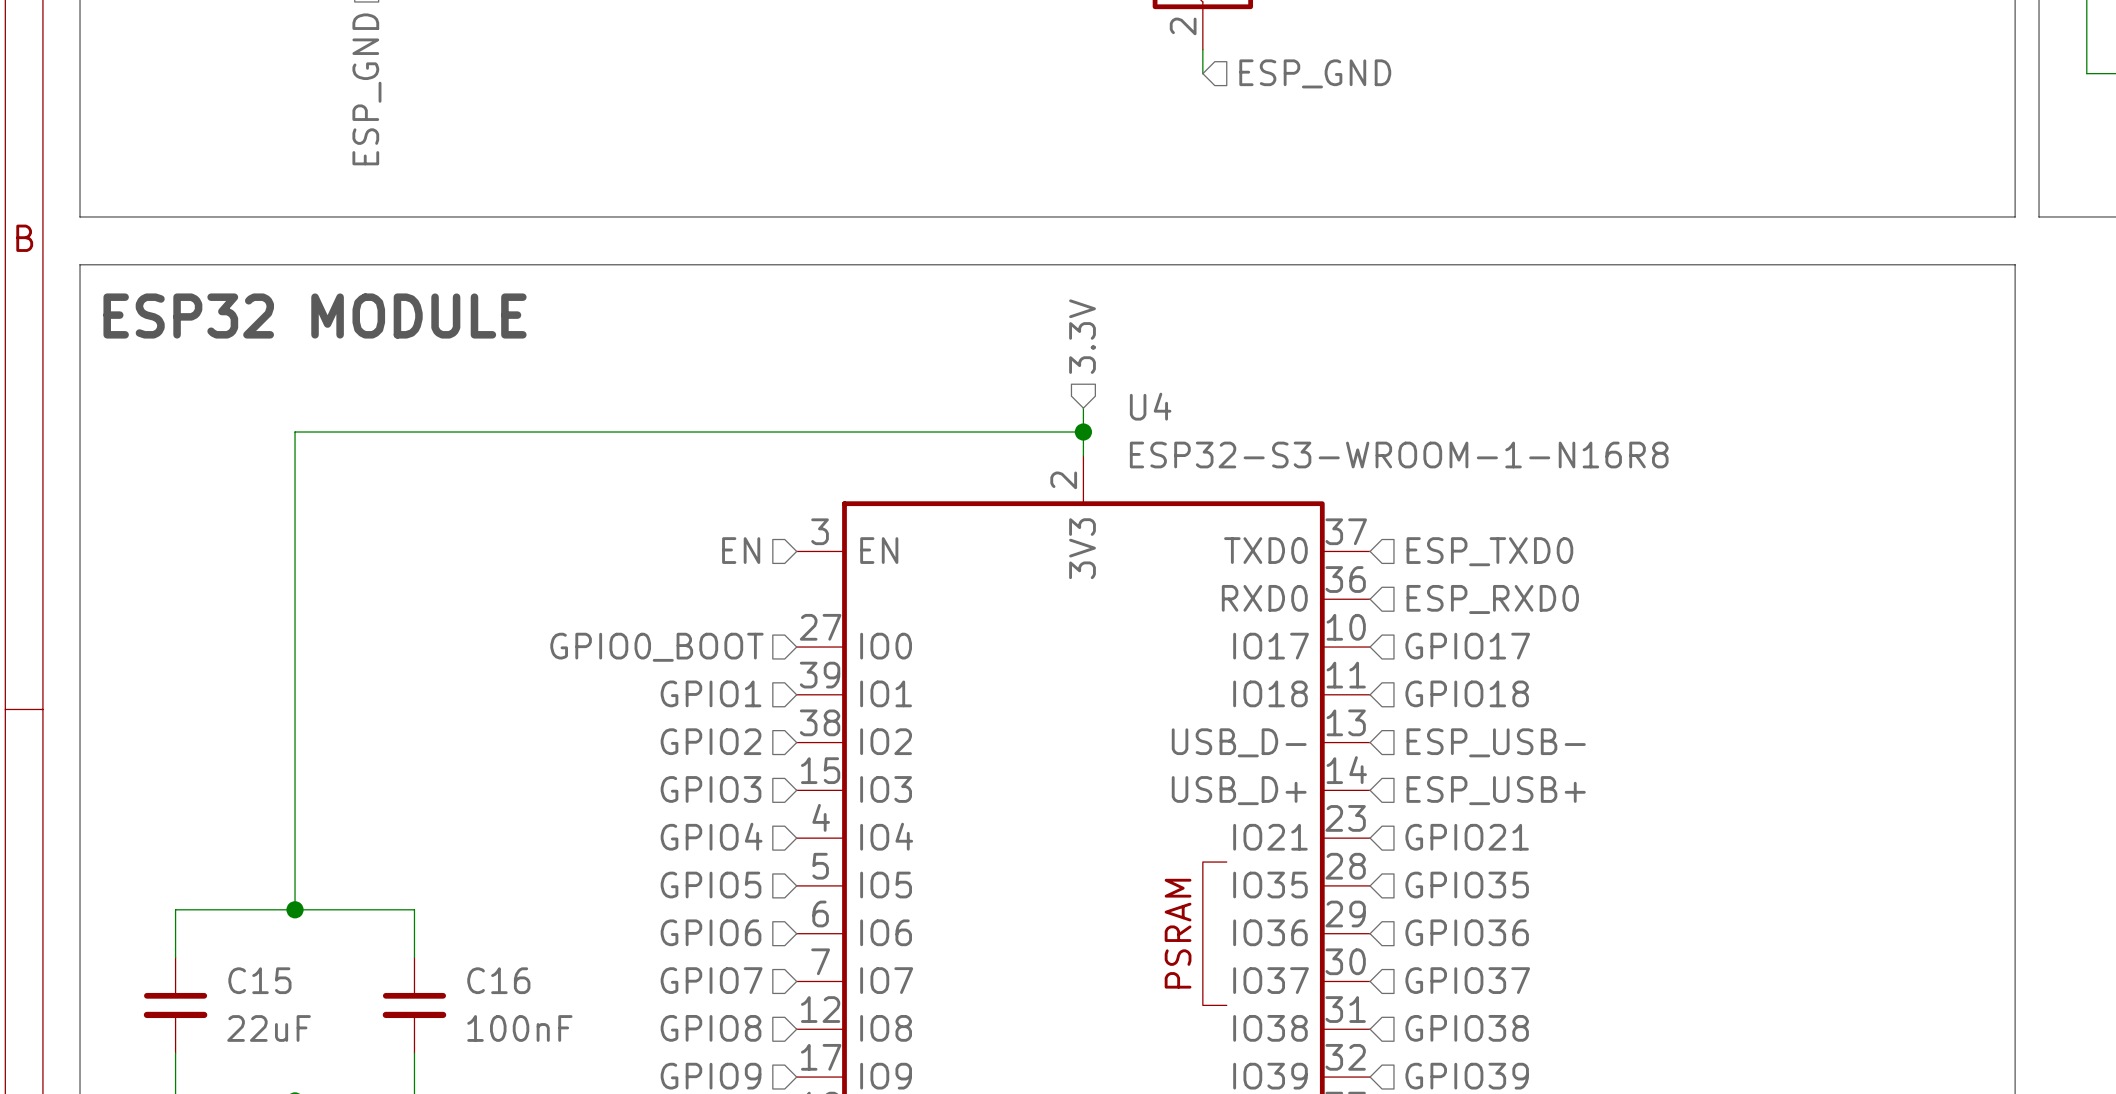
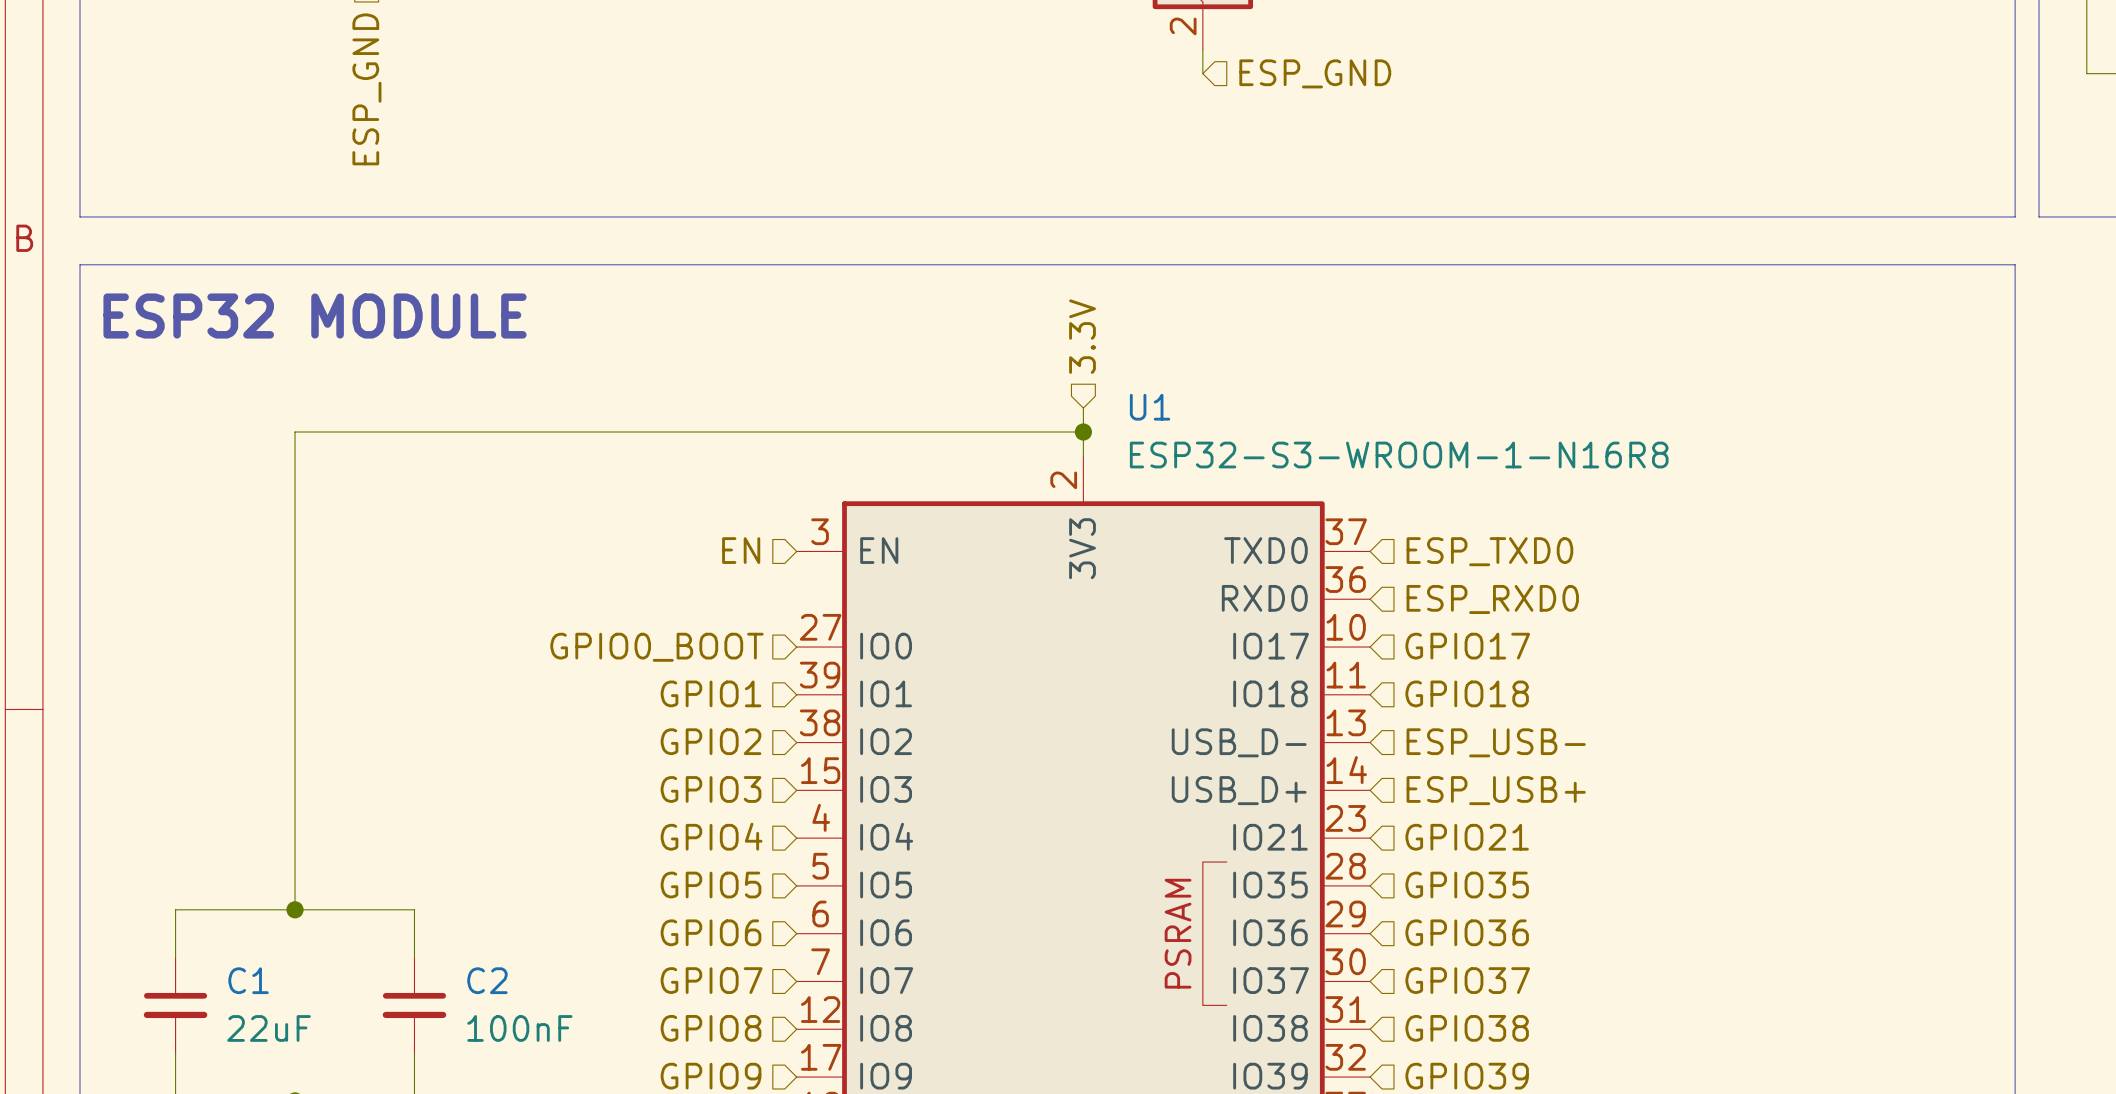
U4 name: U4 (1150, 406) -> U1 (1150, 407)
C15 name: C15 (259, 980) -> C1 (248, 980)
C16 name: C16 (498, 980) -> C2 (487, 980)

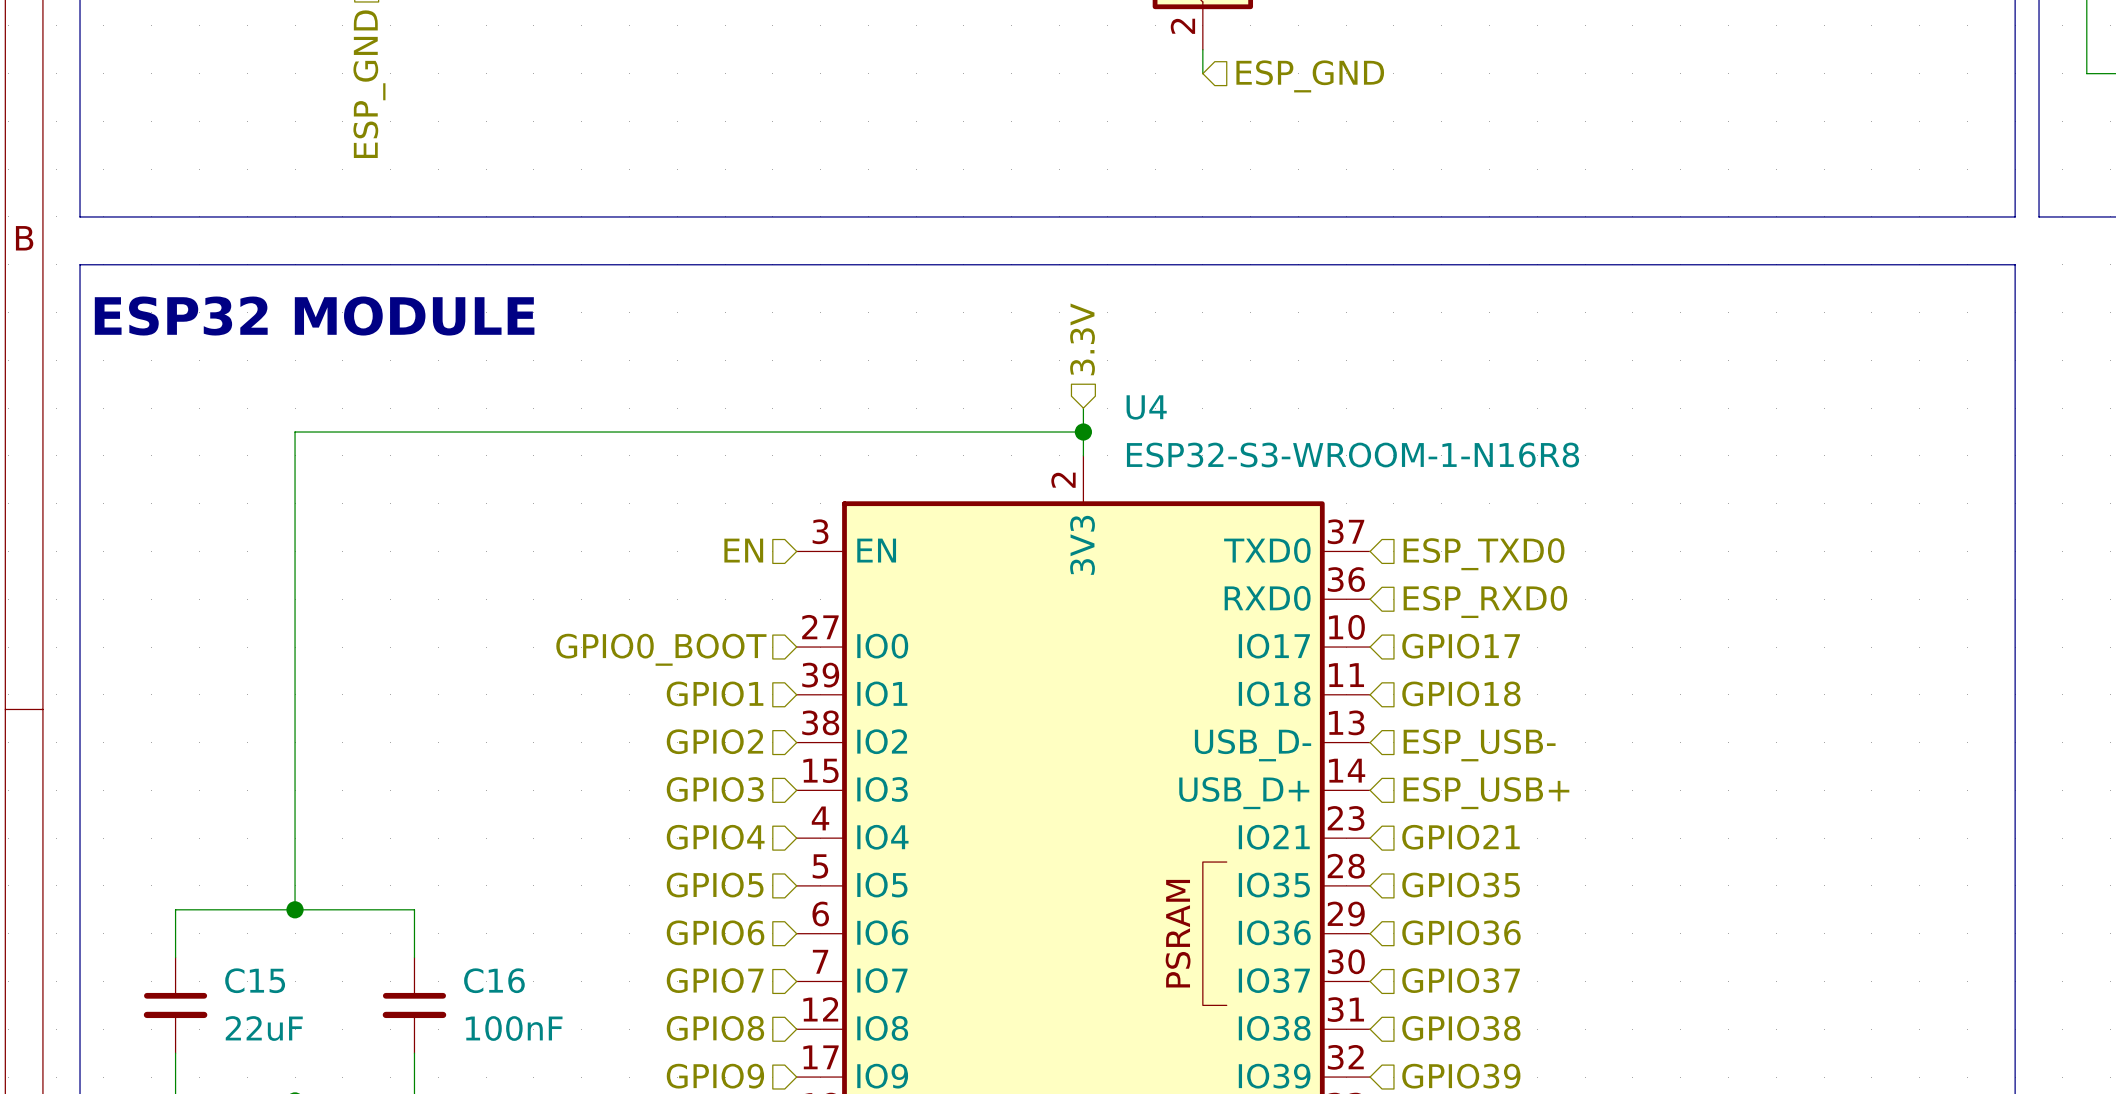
U1 name: U1 (1150, 407) -> U4 (1146, 407)
C1 name: C1 (248, 980) -> C15 (255, 980)
C2 name: C2 (487, 980) -> C16 (494, 980)

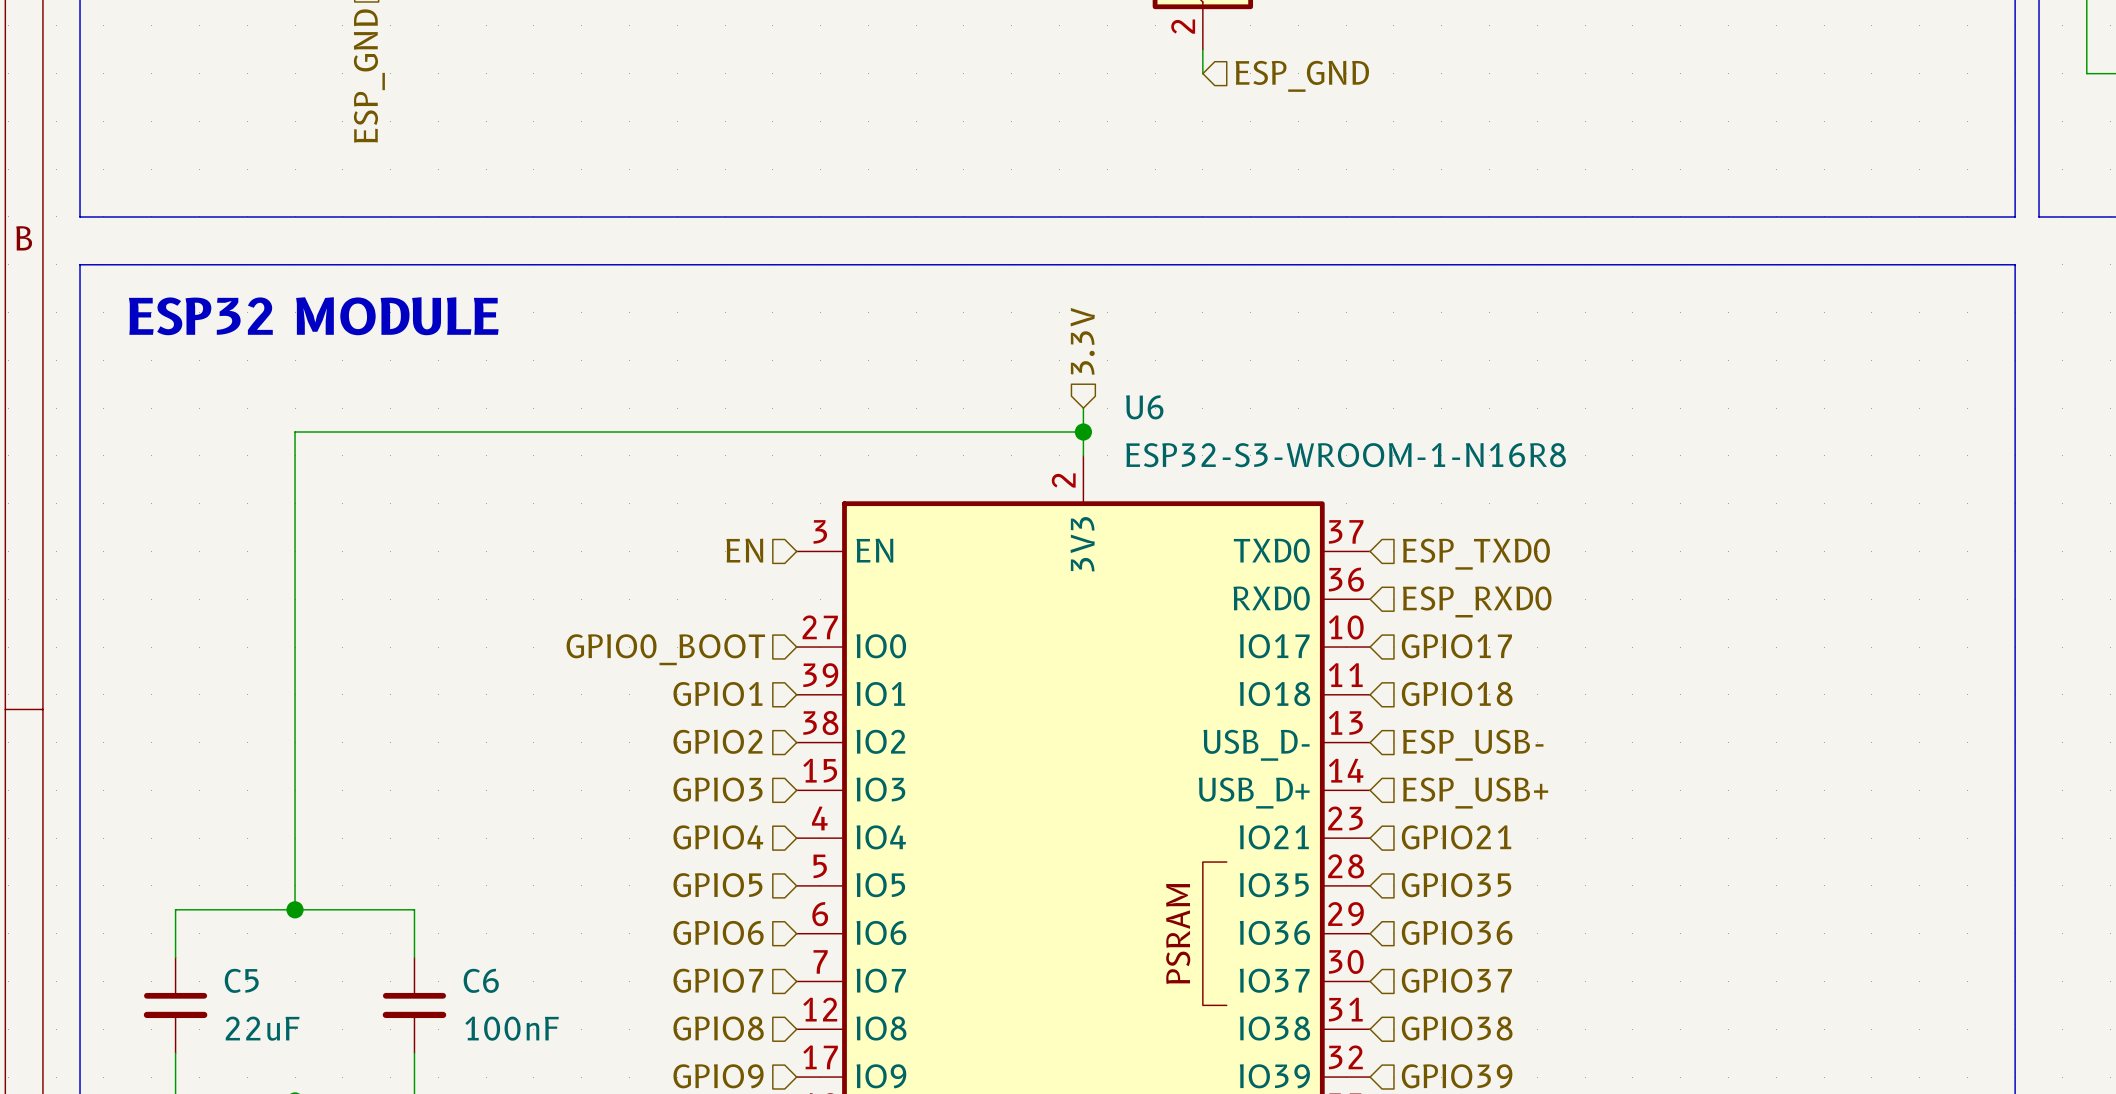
U4 name: U4 (1146, 407) -> U6 (1144, 407)
C15 name: C15 (255, 980) -> C5 (241, 980)
C16 name: C16 (494, 980) -> C6 (481, 980)

